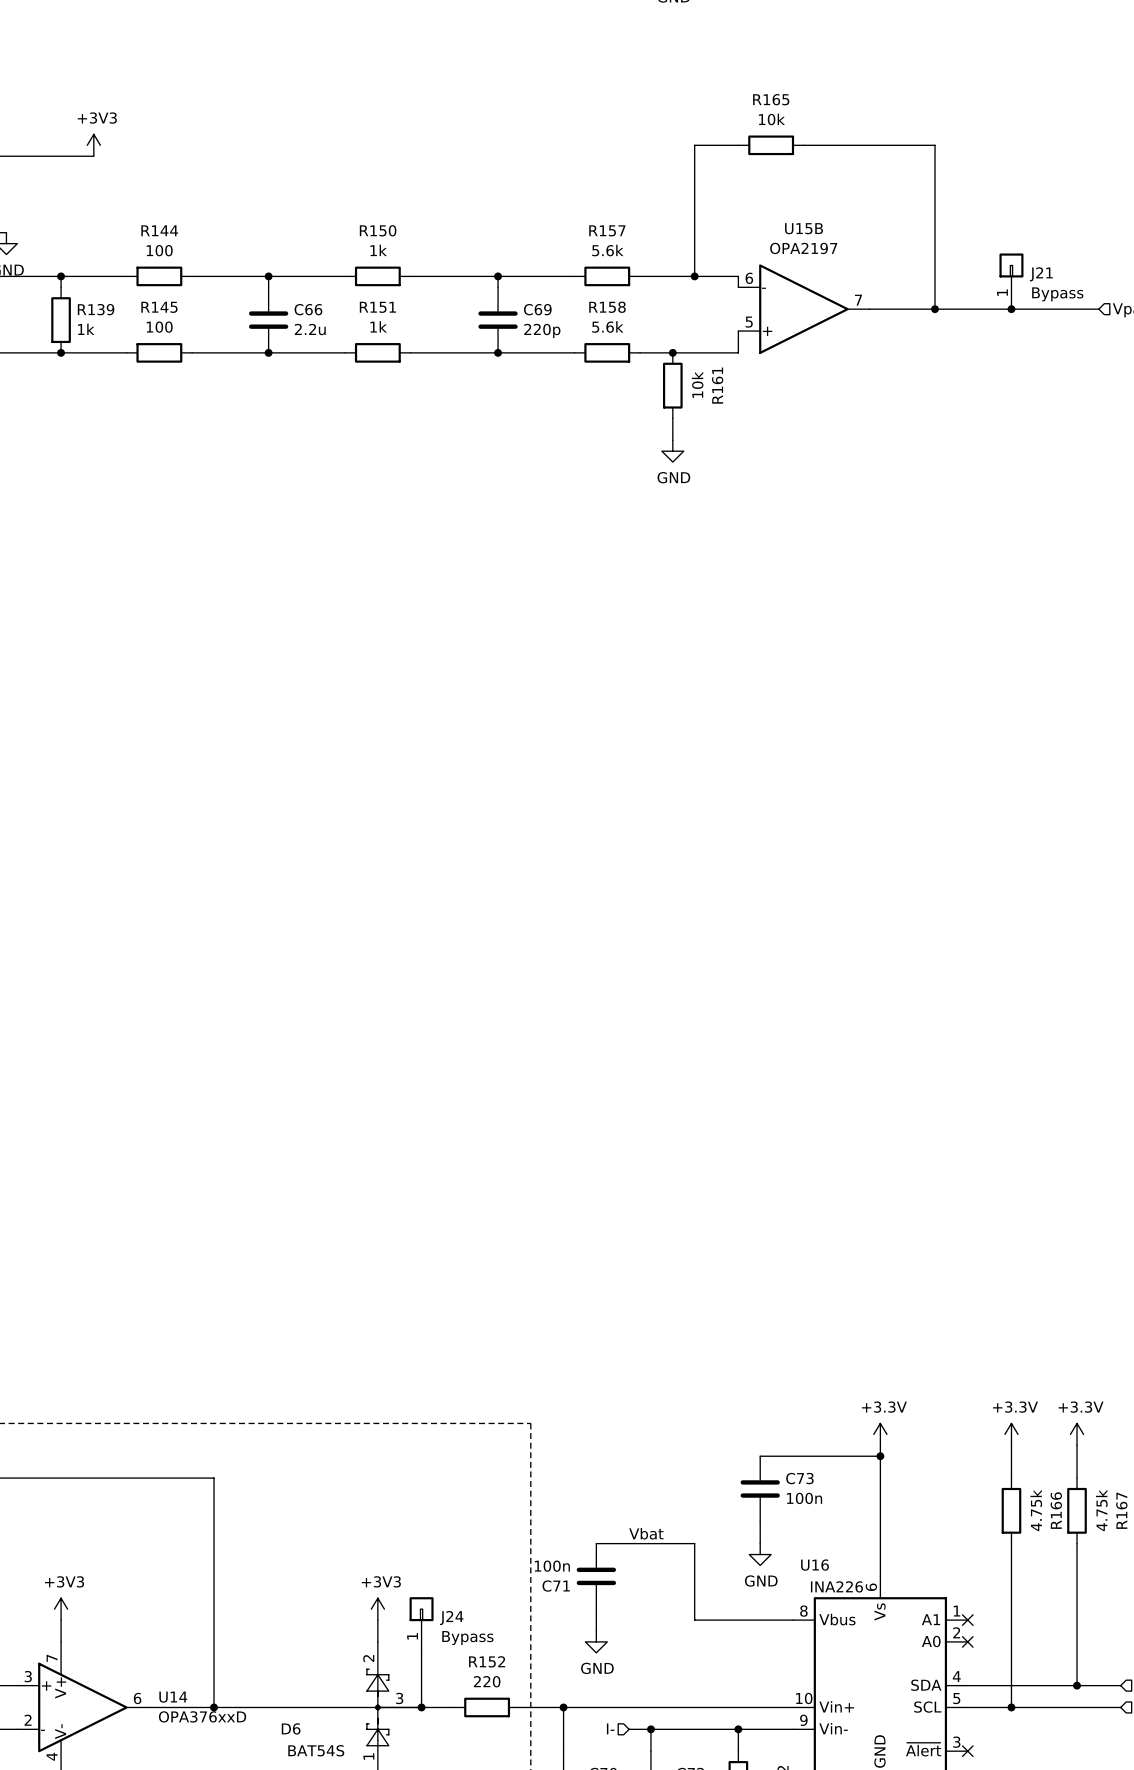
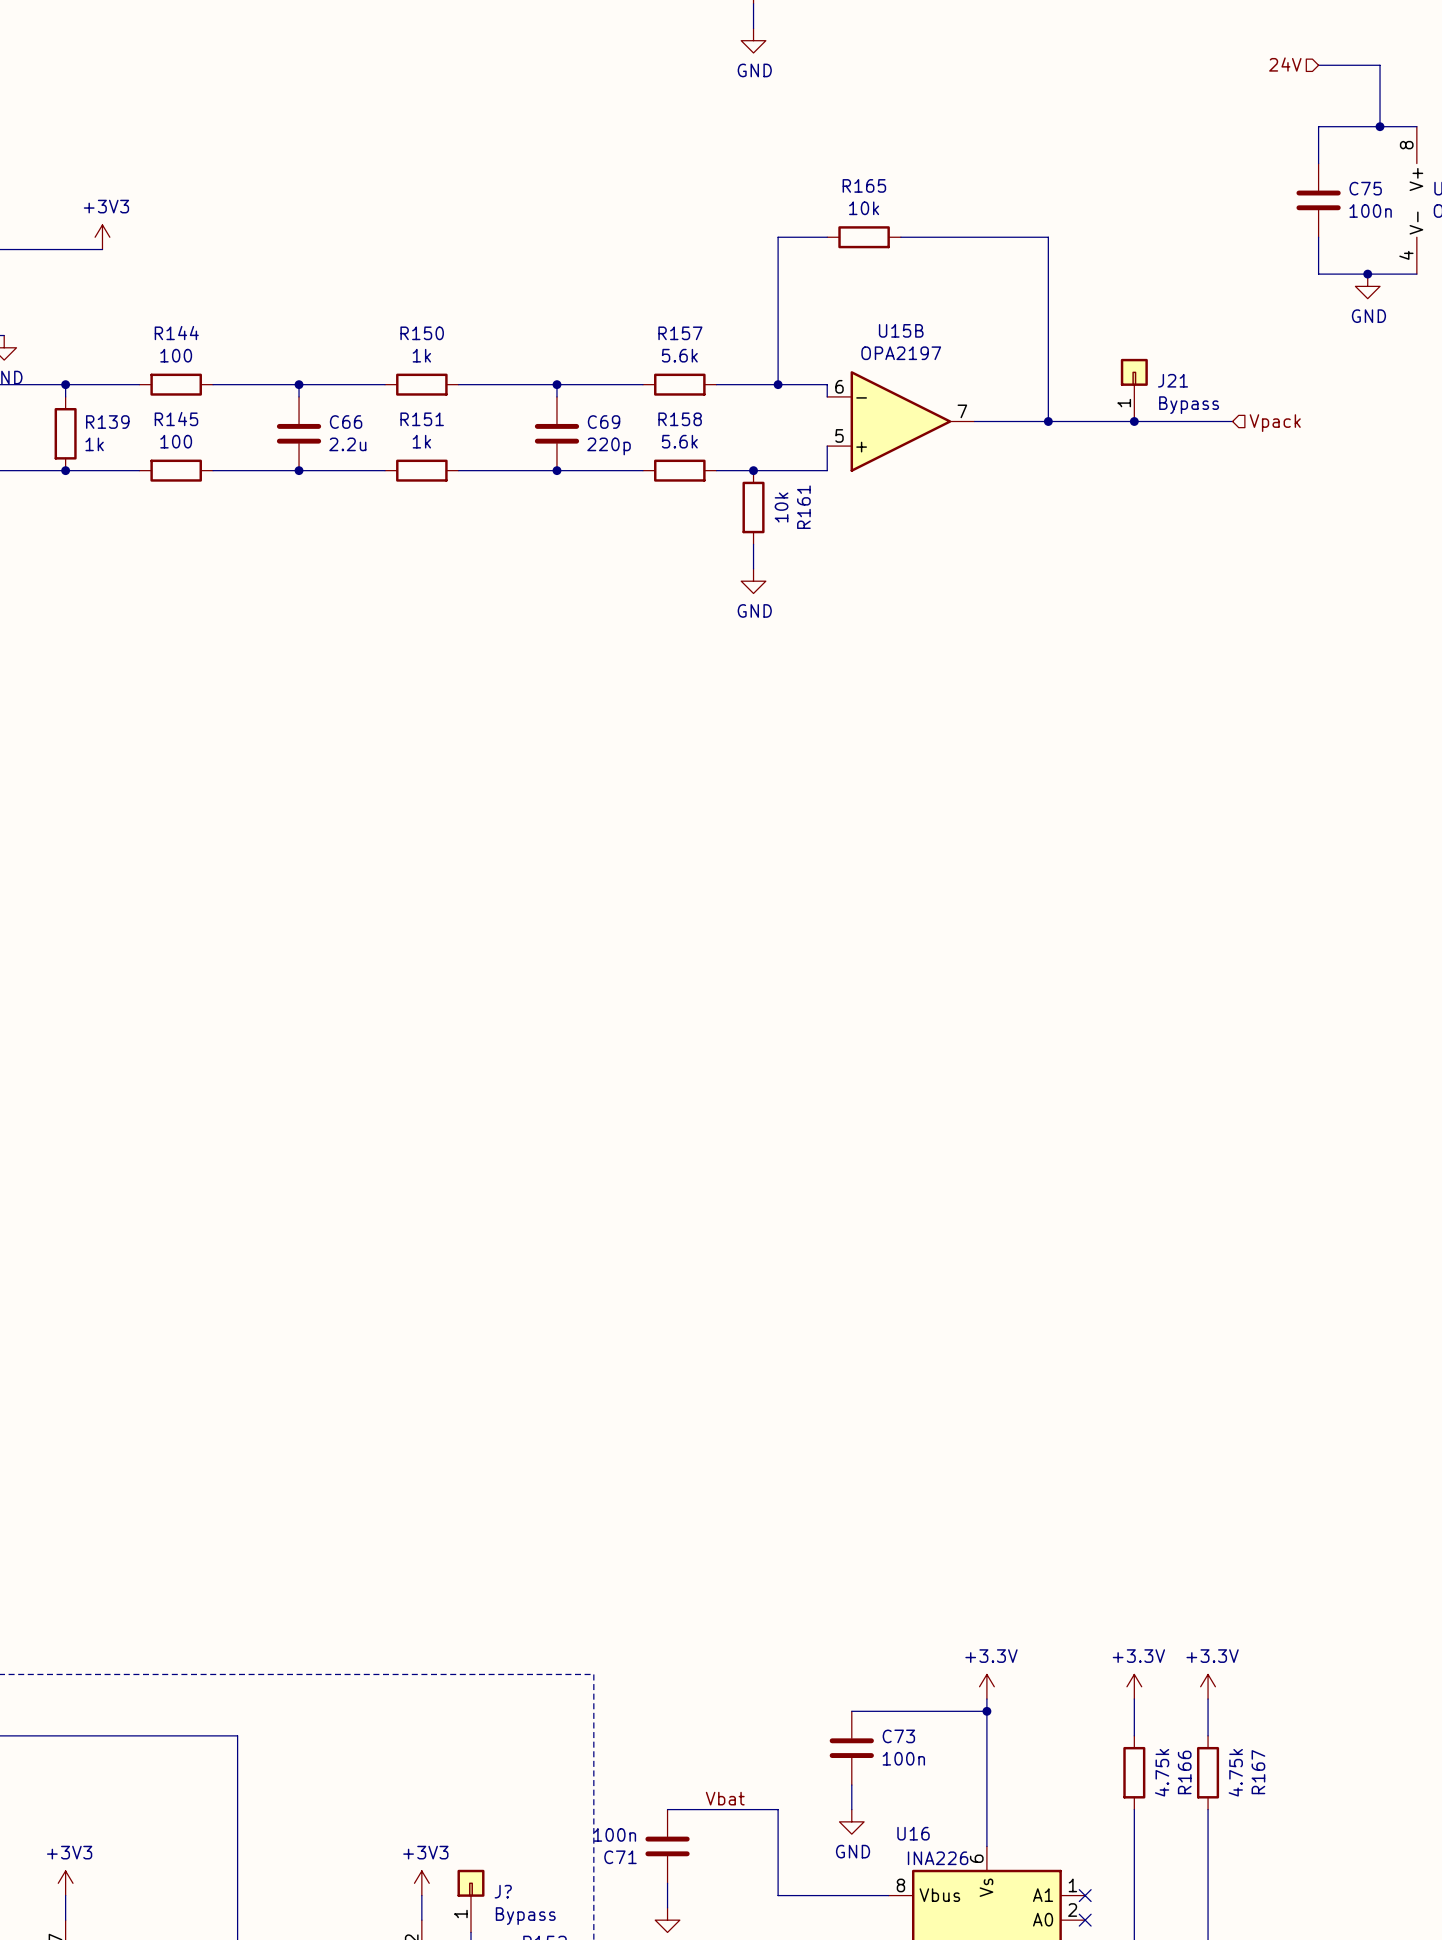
J24 name: J24 (451, 1618) -> J? (503, 1891)

